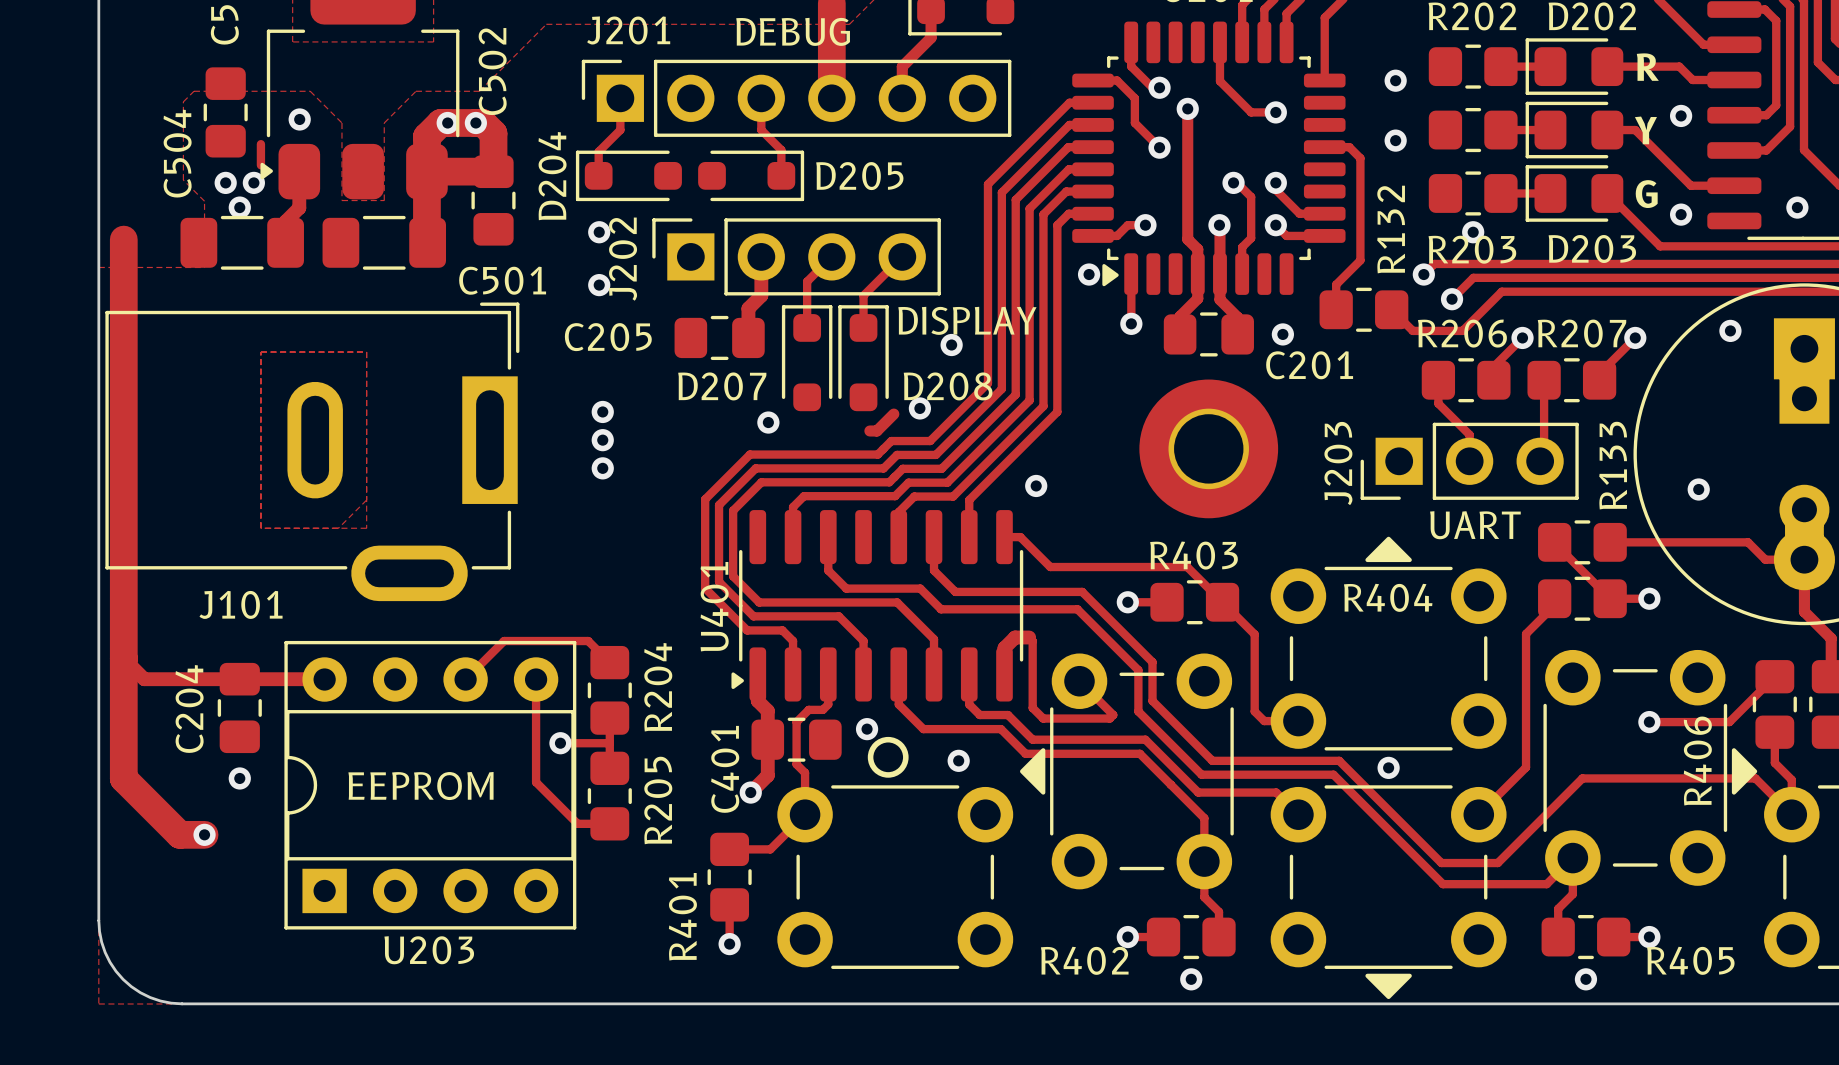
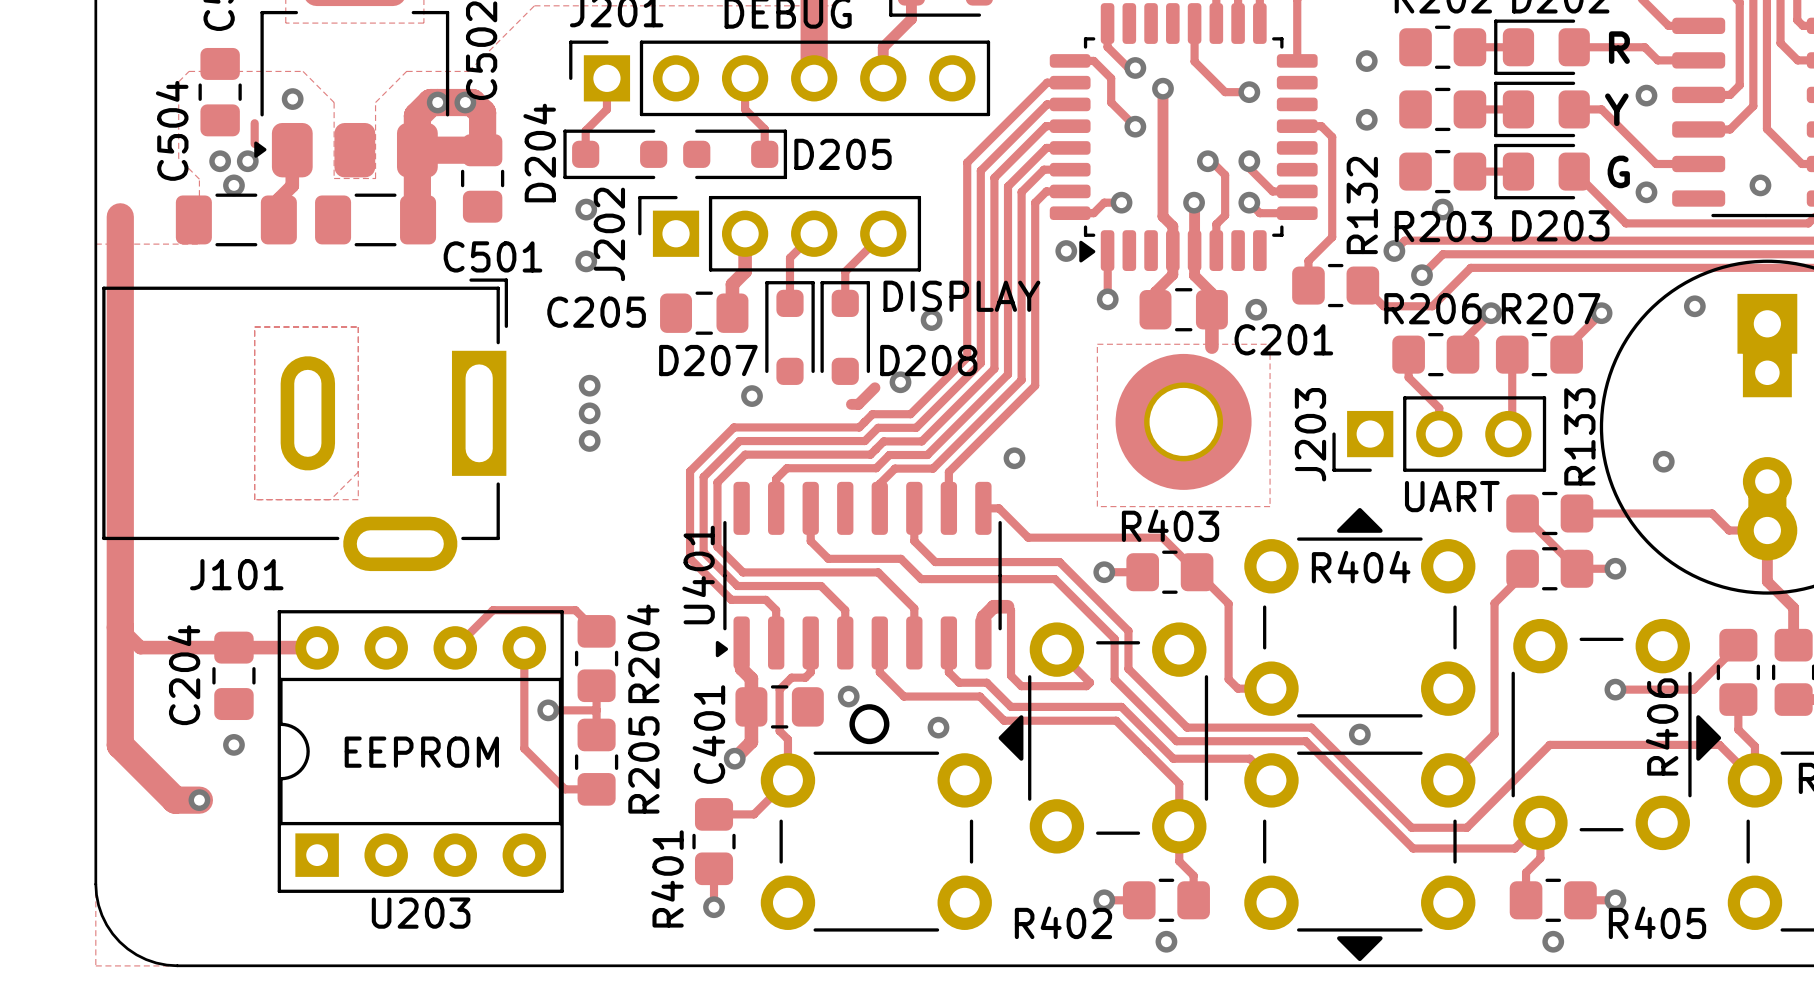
track: none -> (1211, 309) (1211, 347)
zone outline: none -> (1097, 344) (1270, 344) (1270, 506) (1097, 506) (1097, 344)

